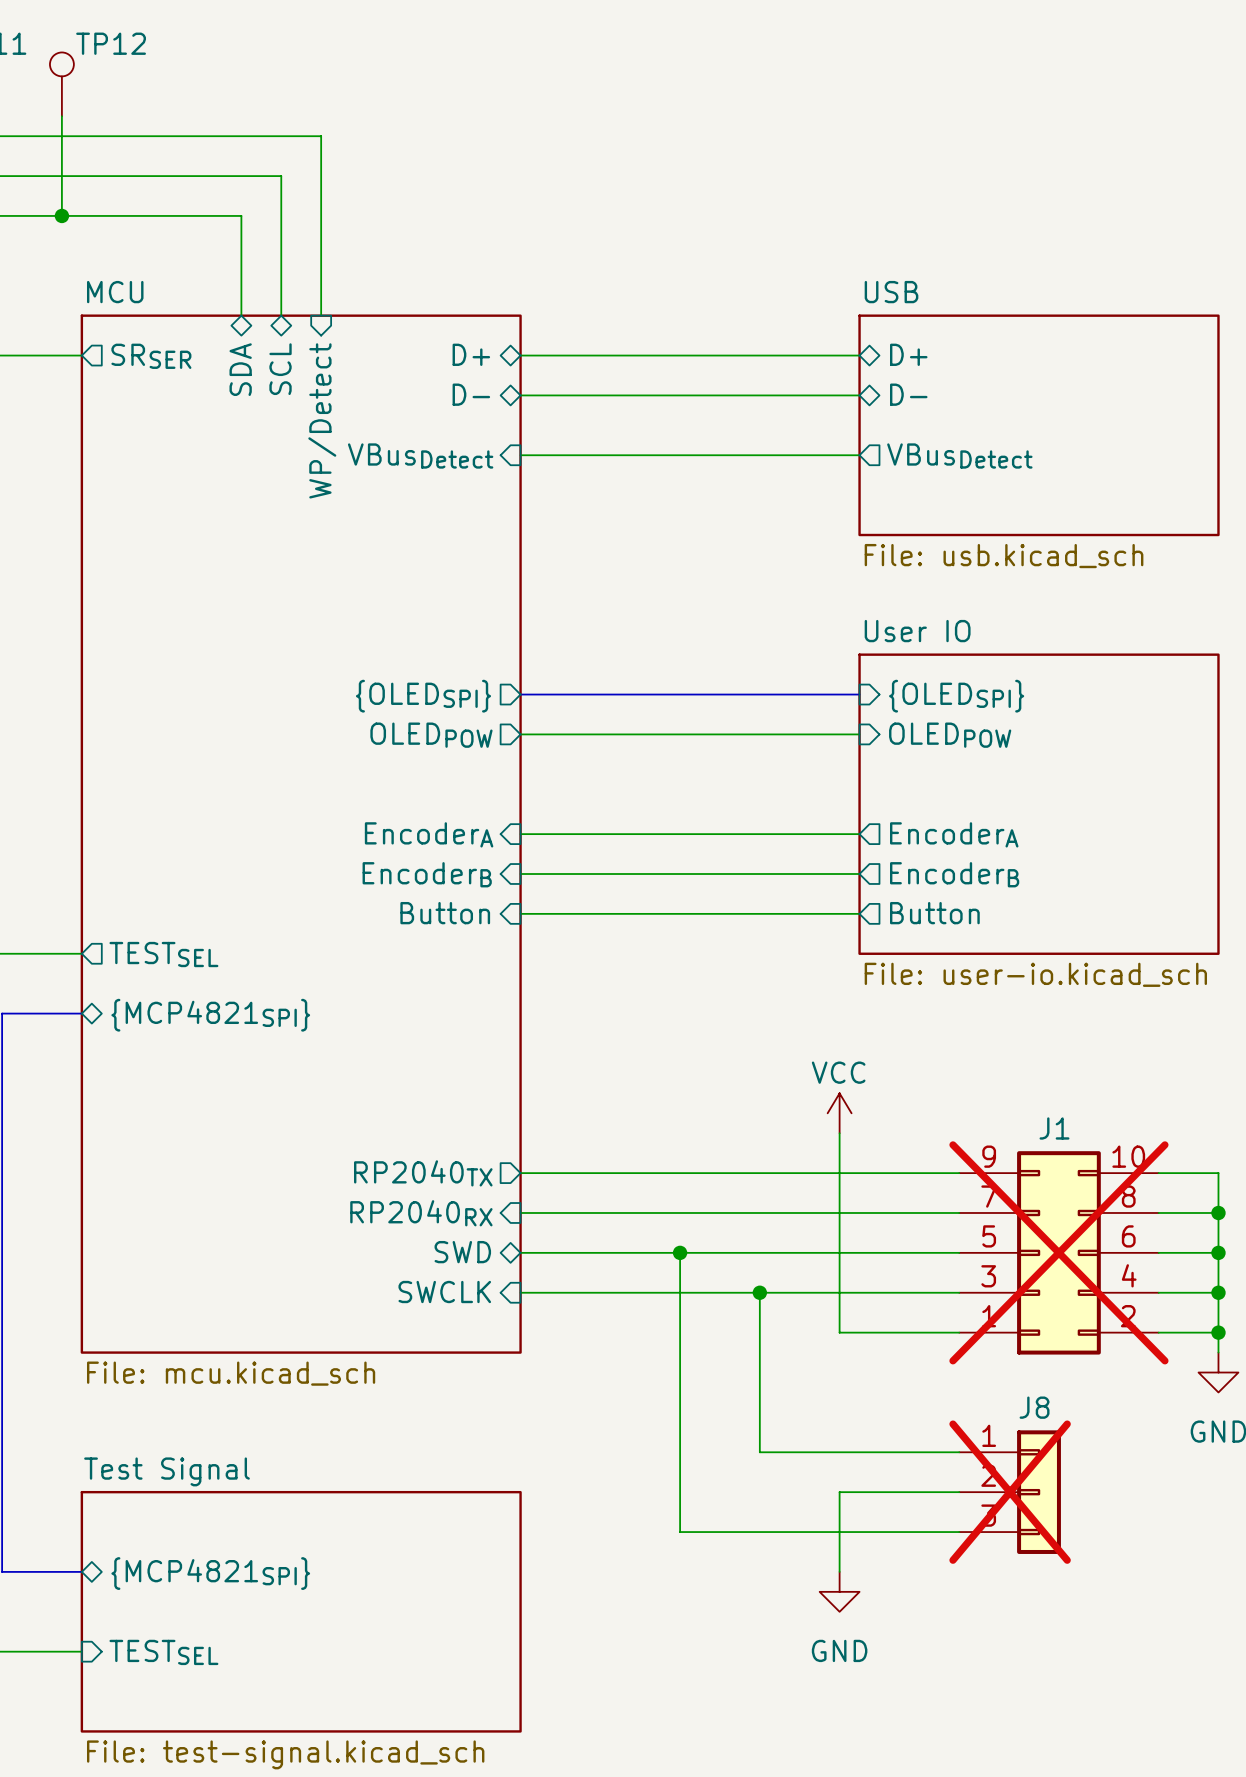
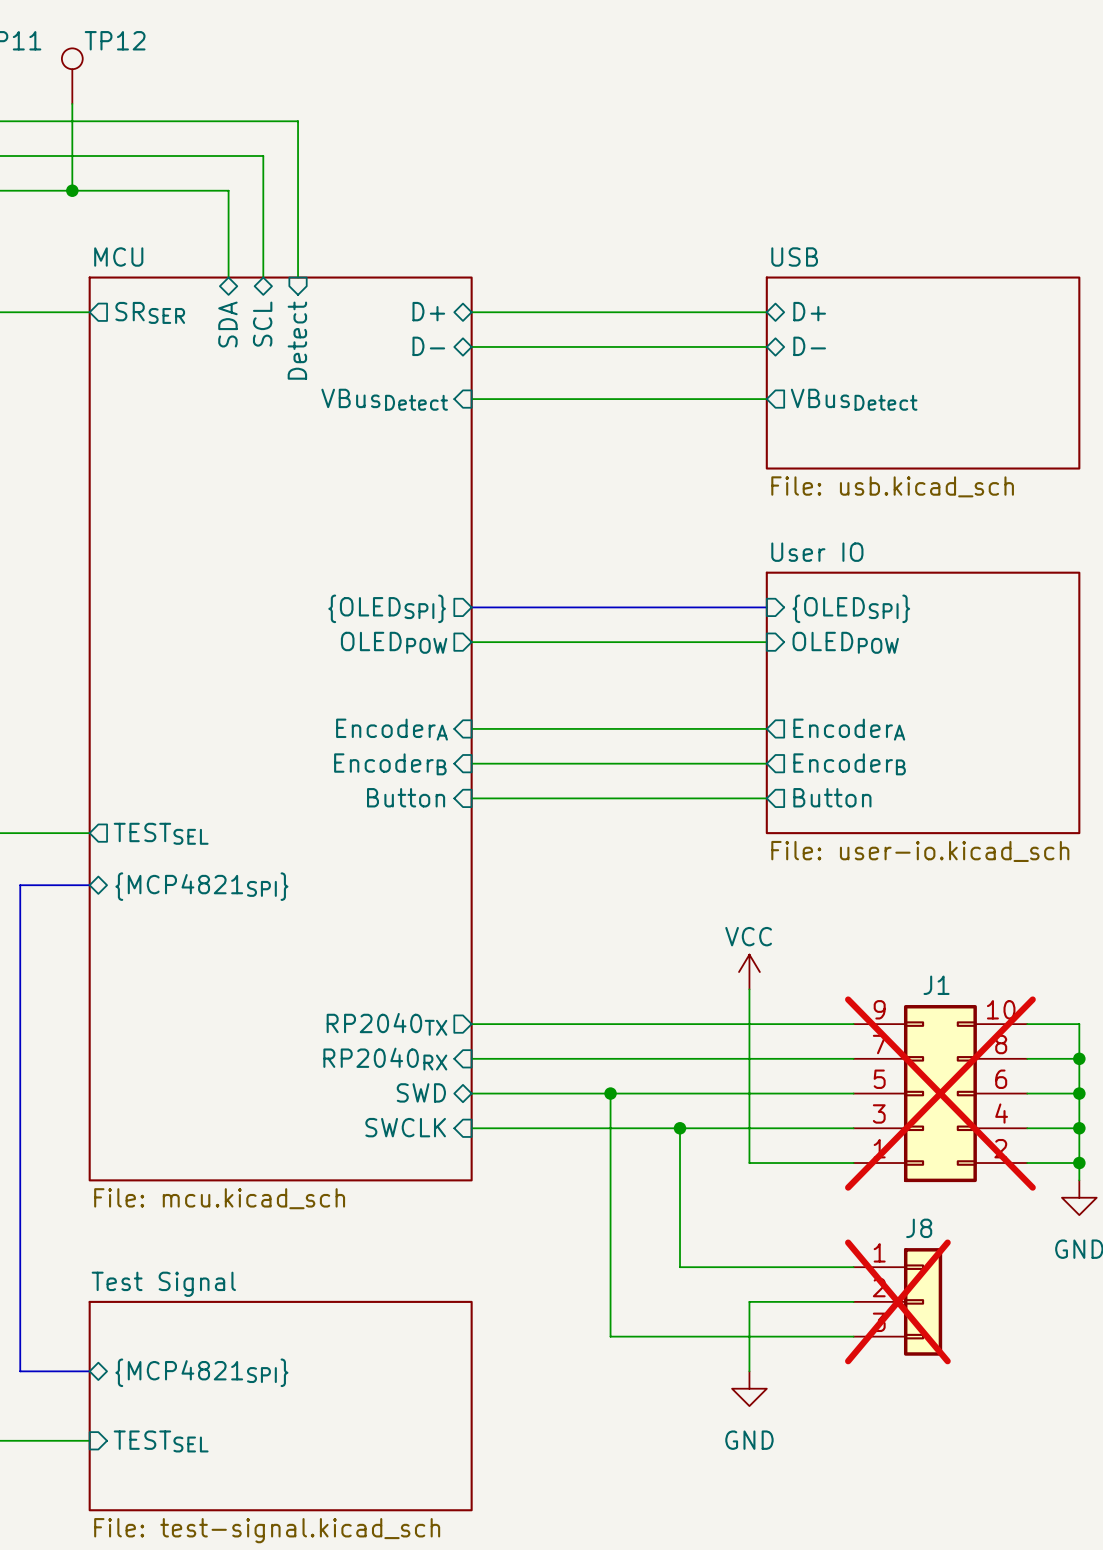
sheet pin: WP/Detect (322, 420) -> Detect (297, 340)

